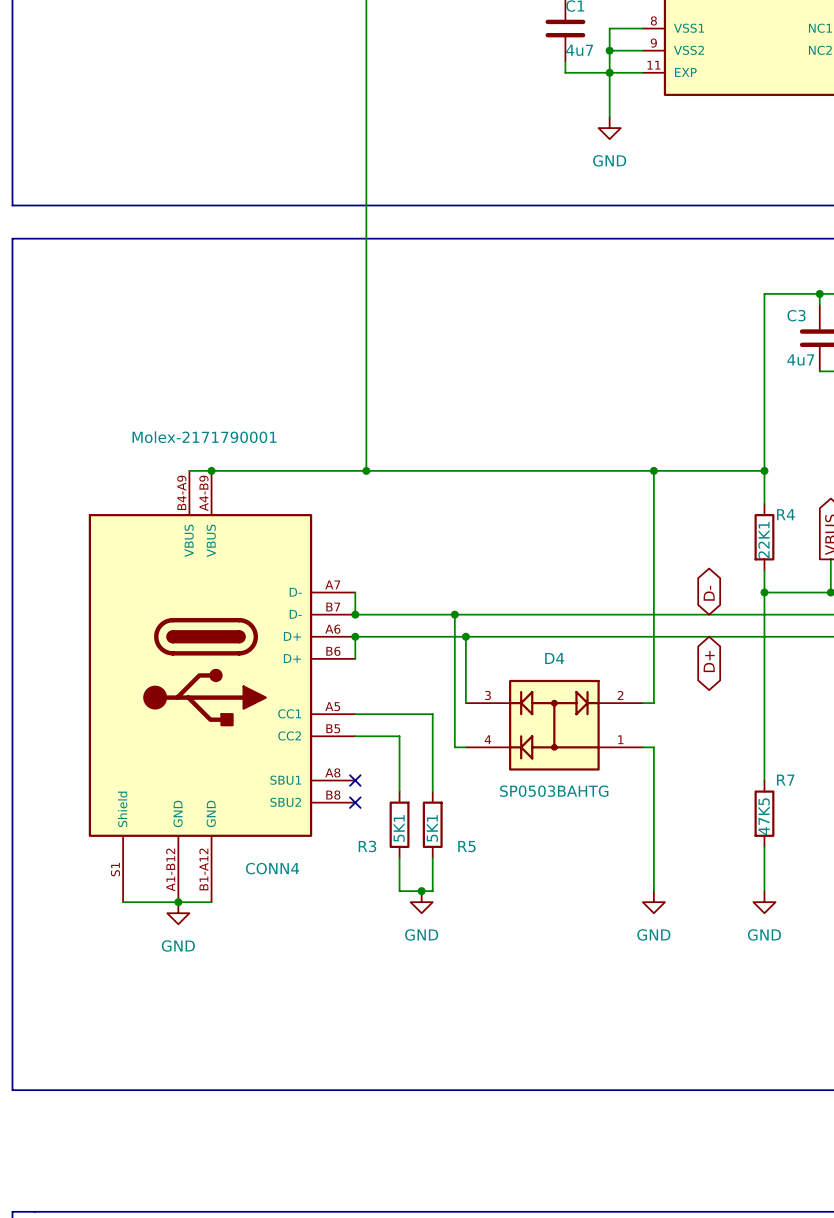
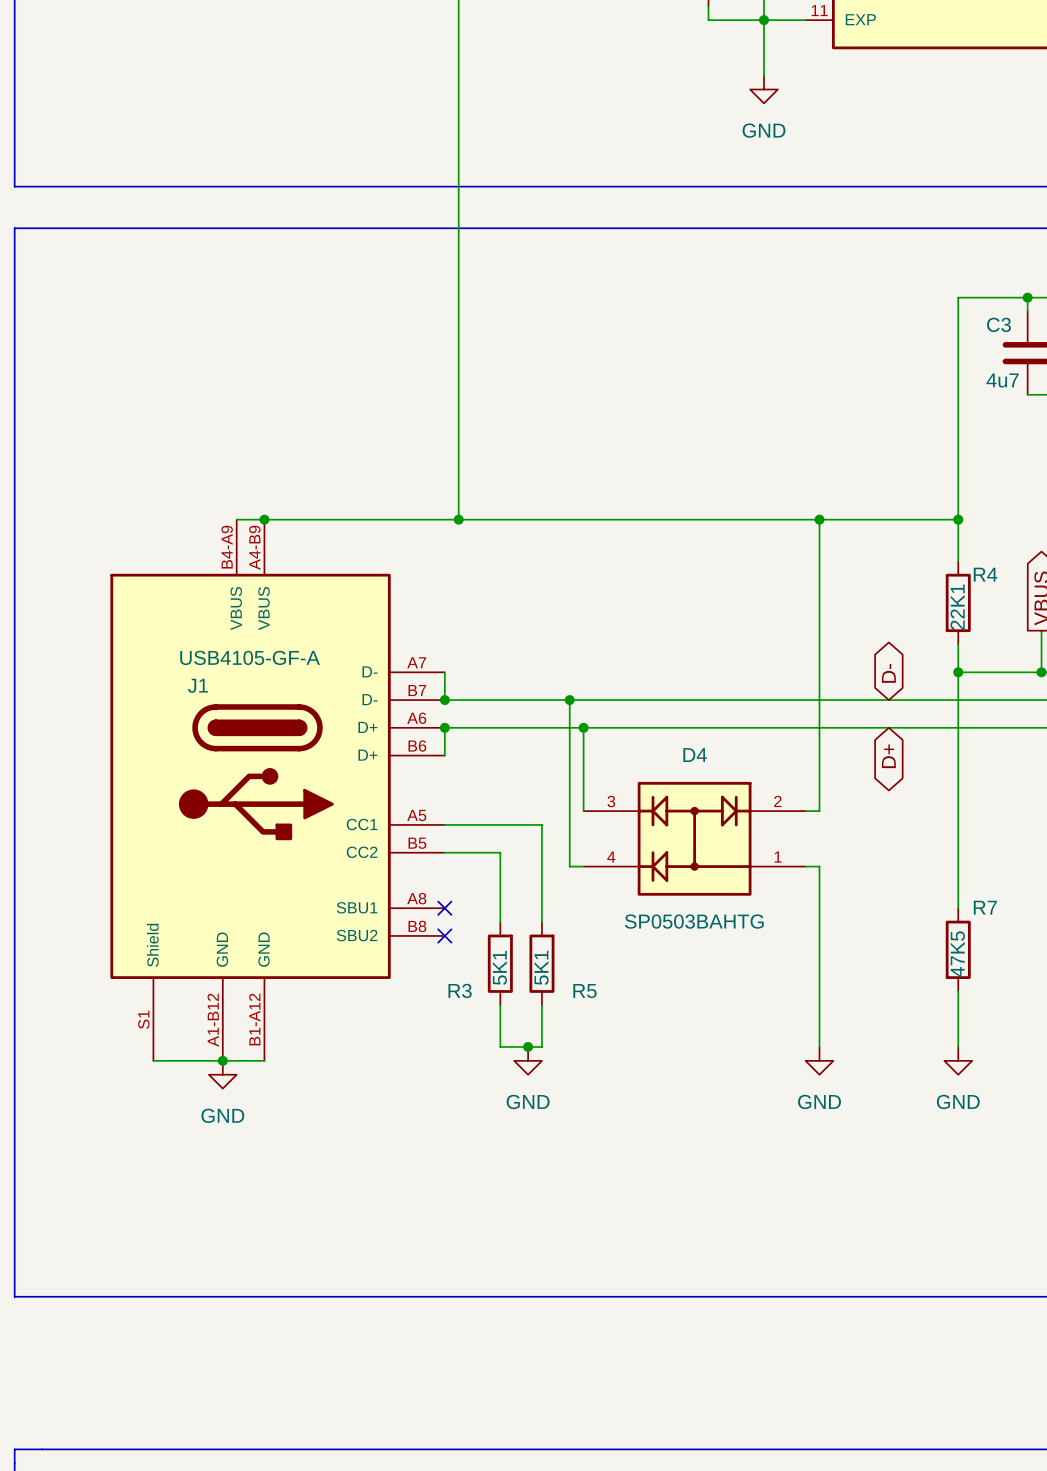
CONN4 value: Molex-2171790001 (204, 437) -> USB4105-GF-A (250, 657)
CONN4 name: CONN4 (272, 868) -> J1 (197, 685)

